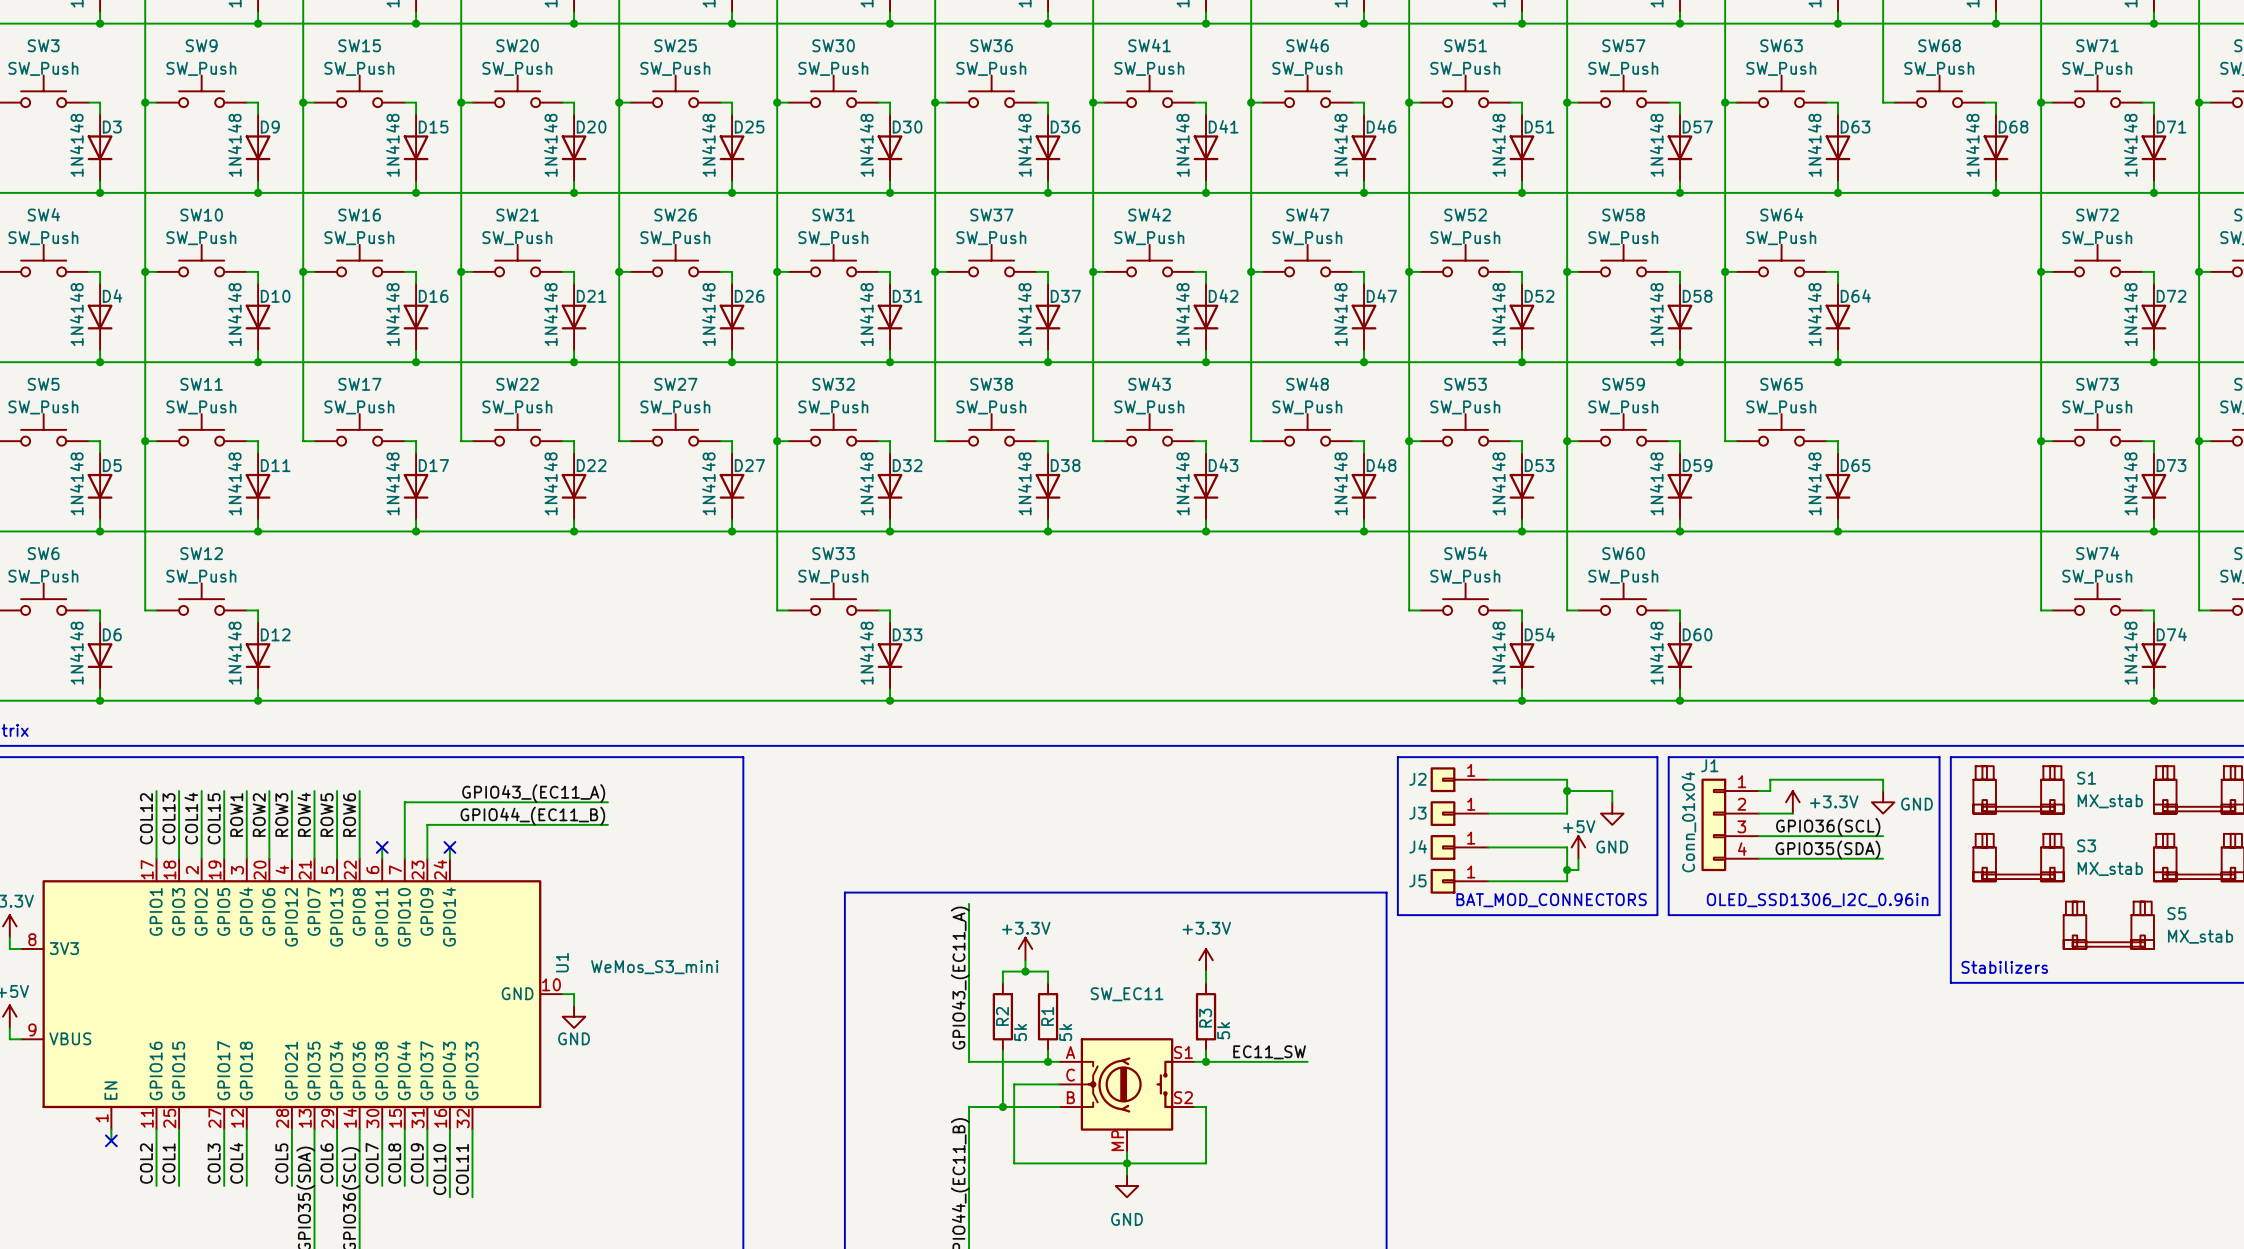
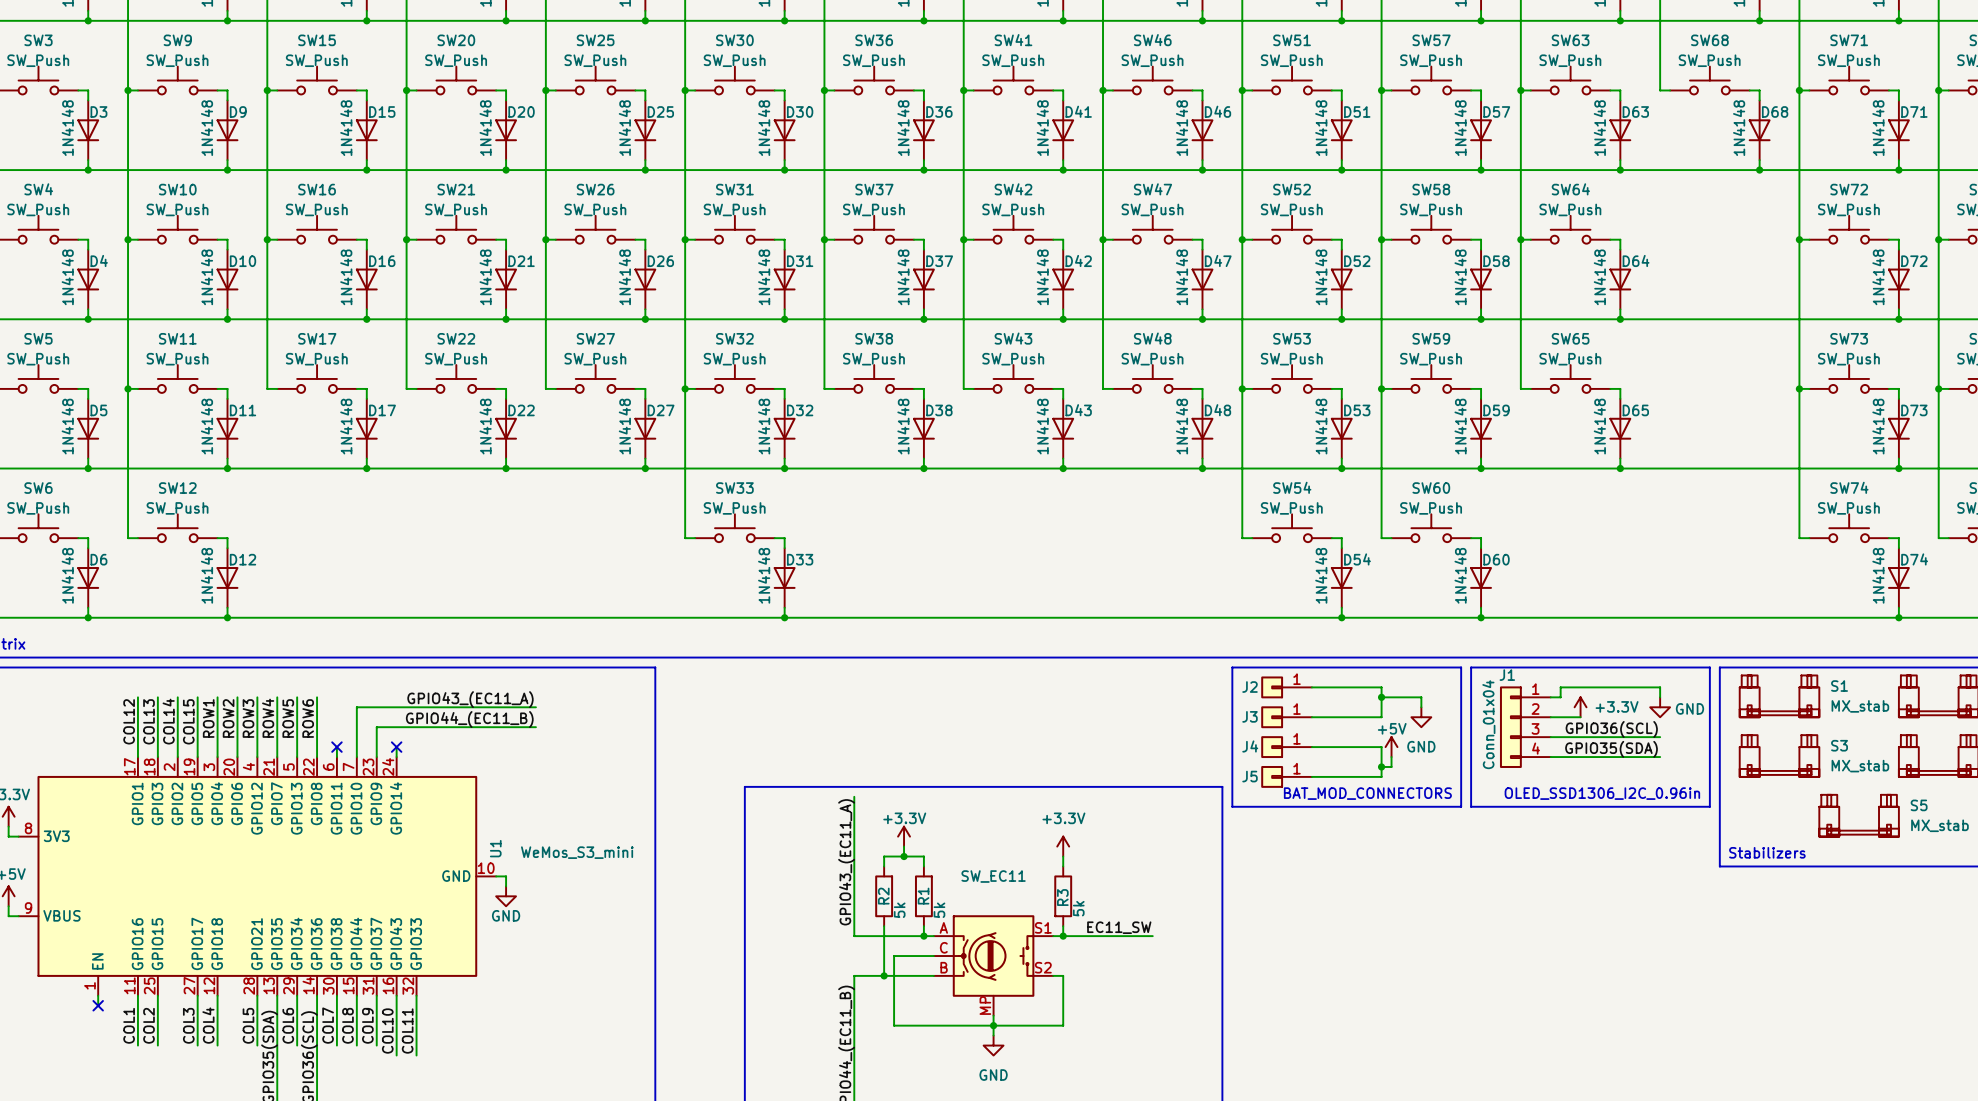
label: COL2 (146, 1163) -> COL1 (129, 1025)
label: COL1 (169, 1163) -> COL2 (148, 1025)

